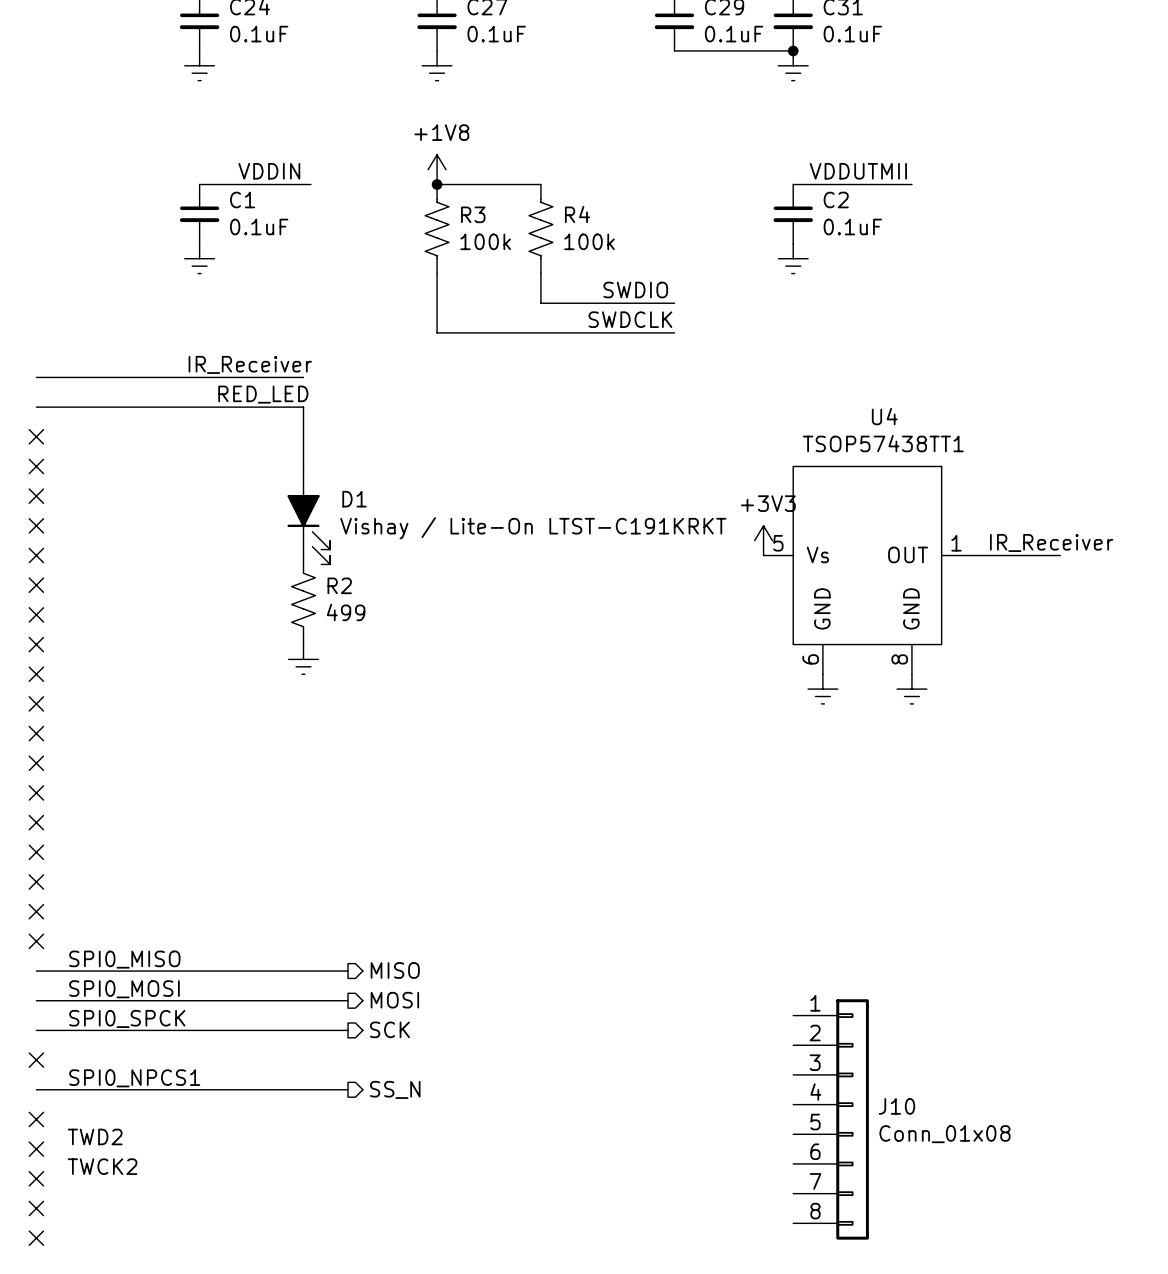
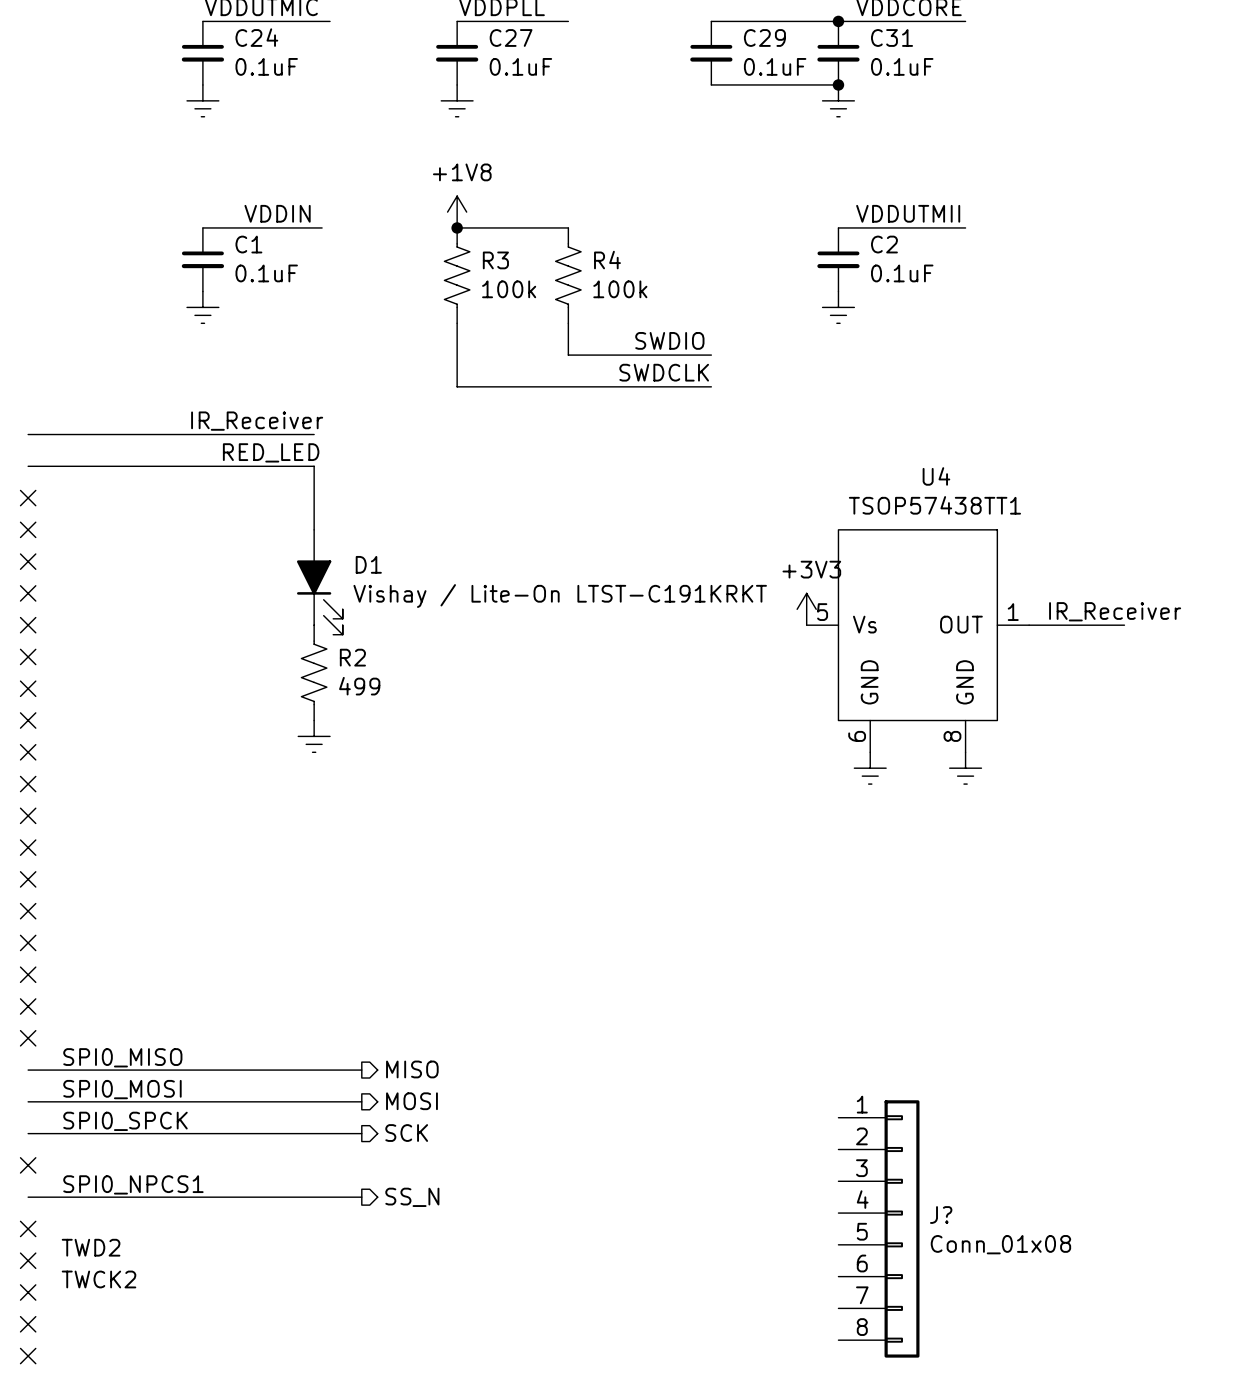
J10 name: J10 (896, 1106) -> J? (941, 1215)

